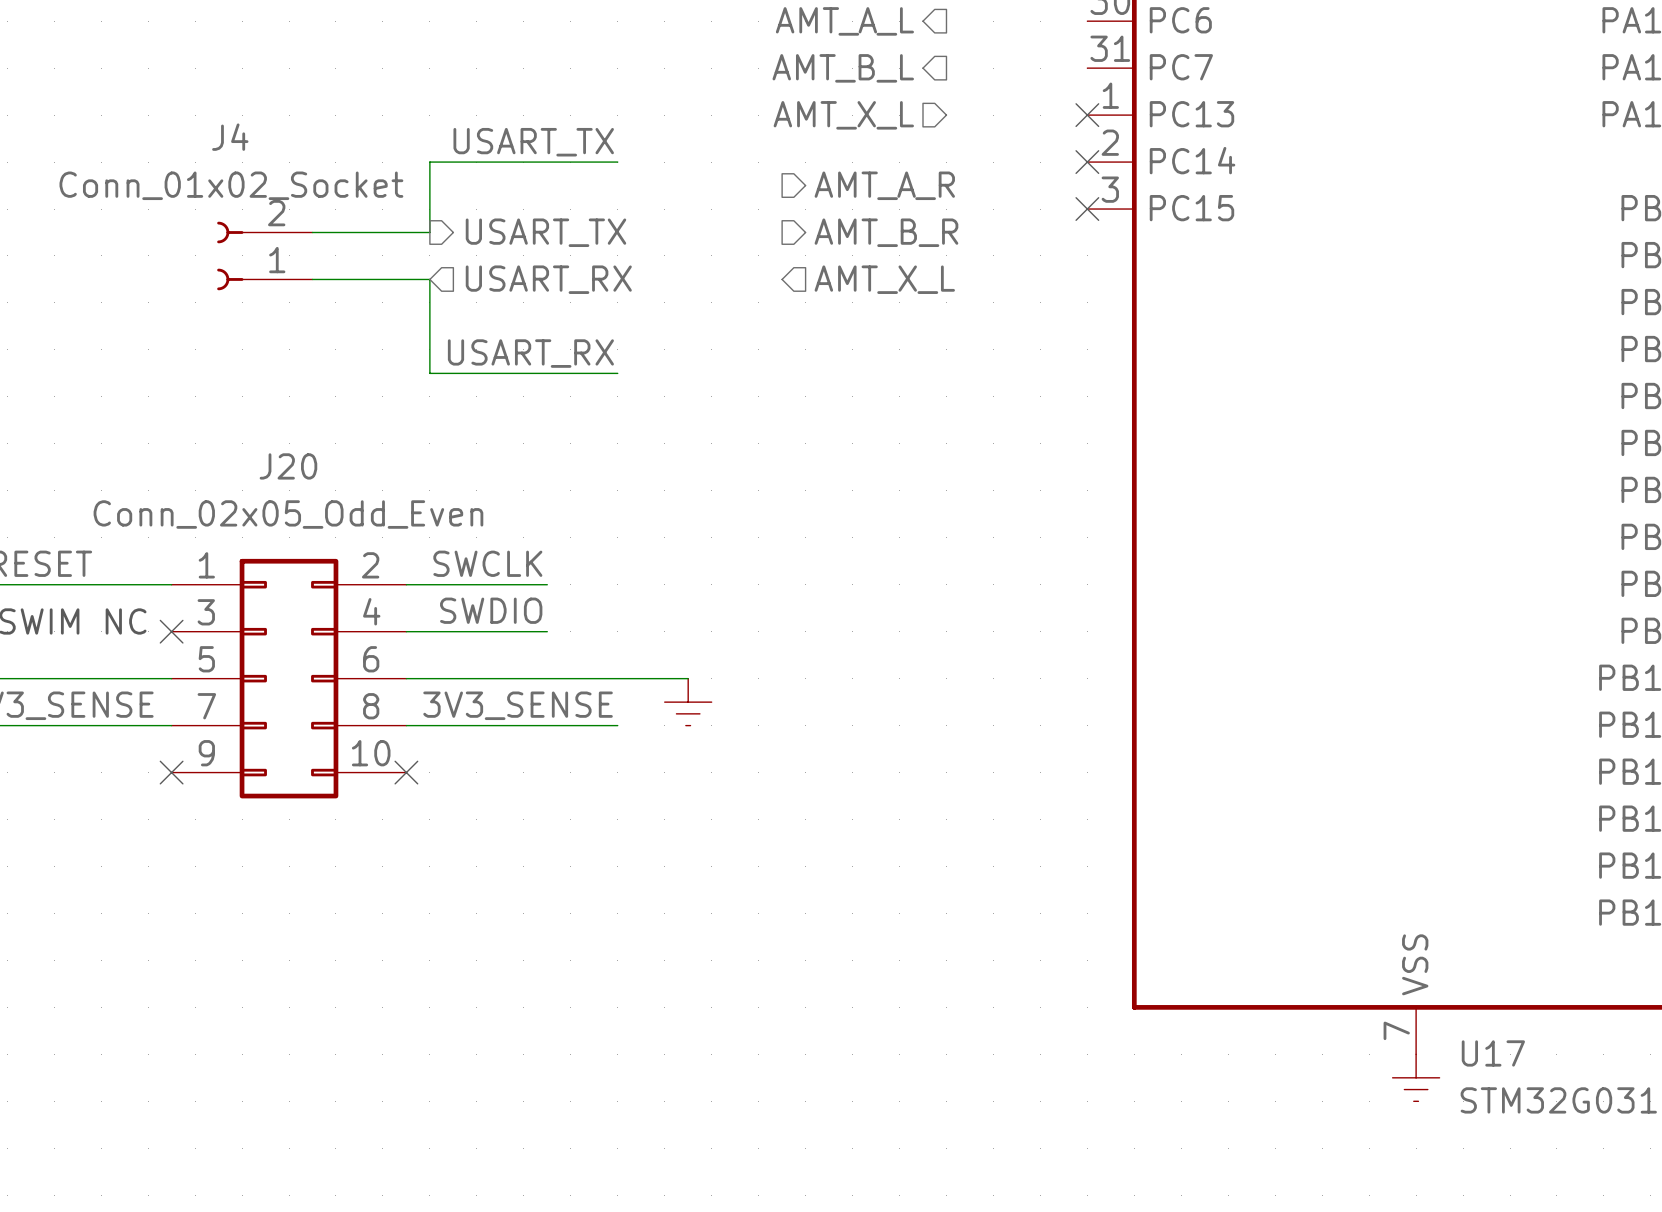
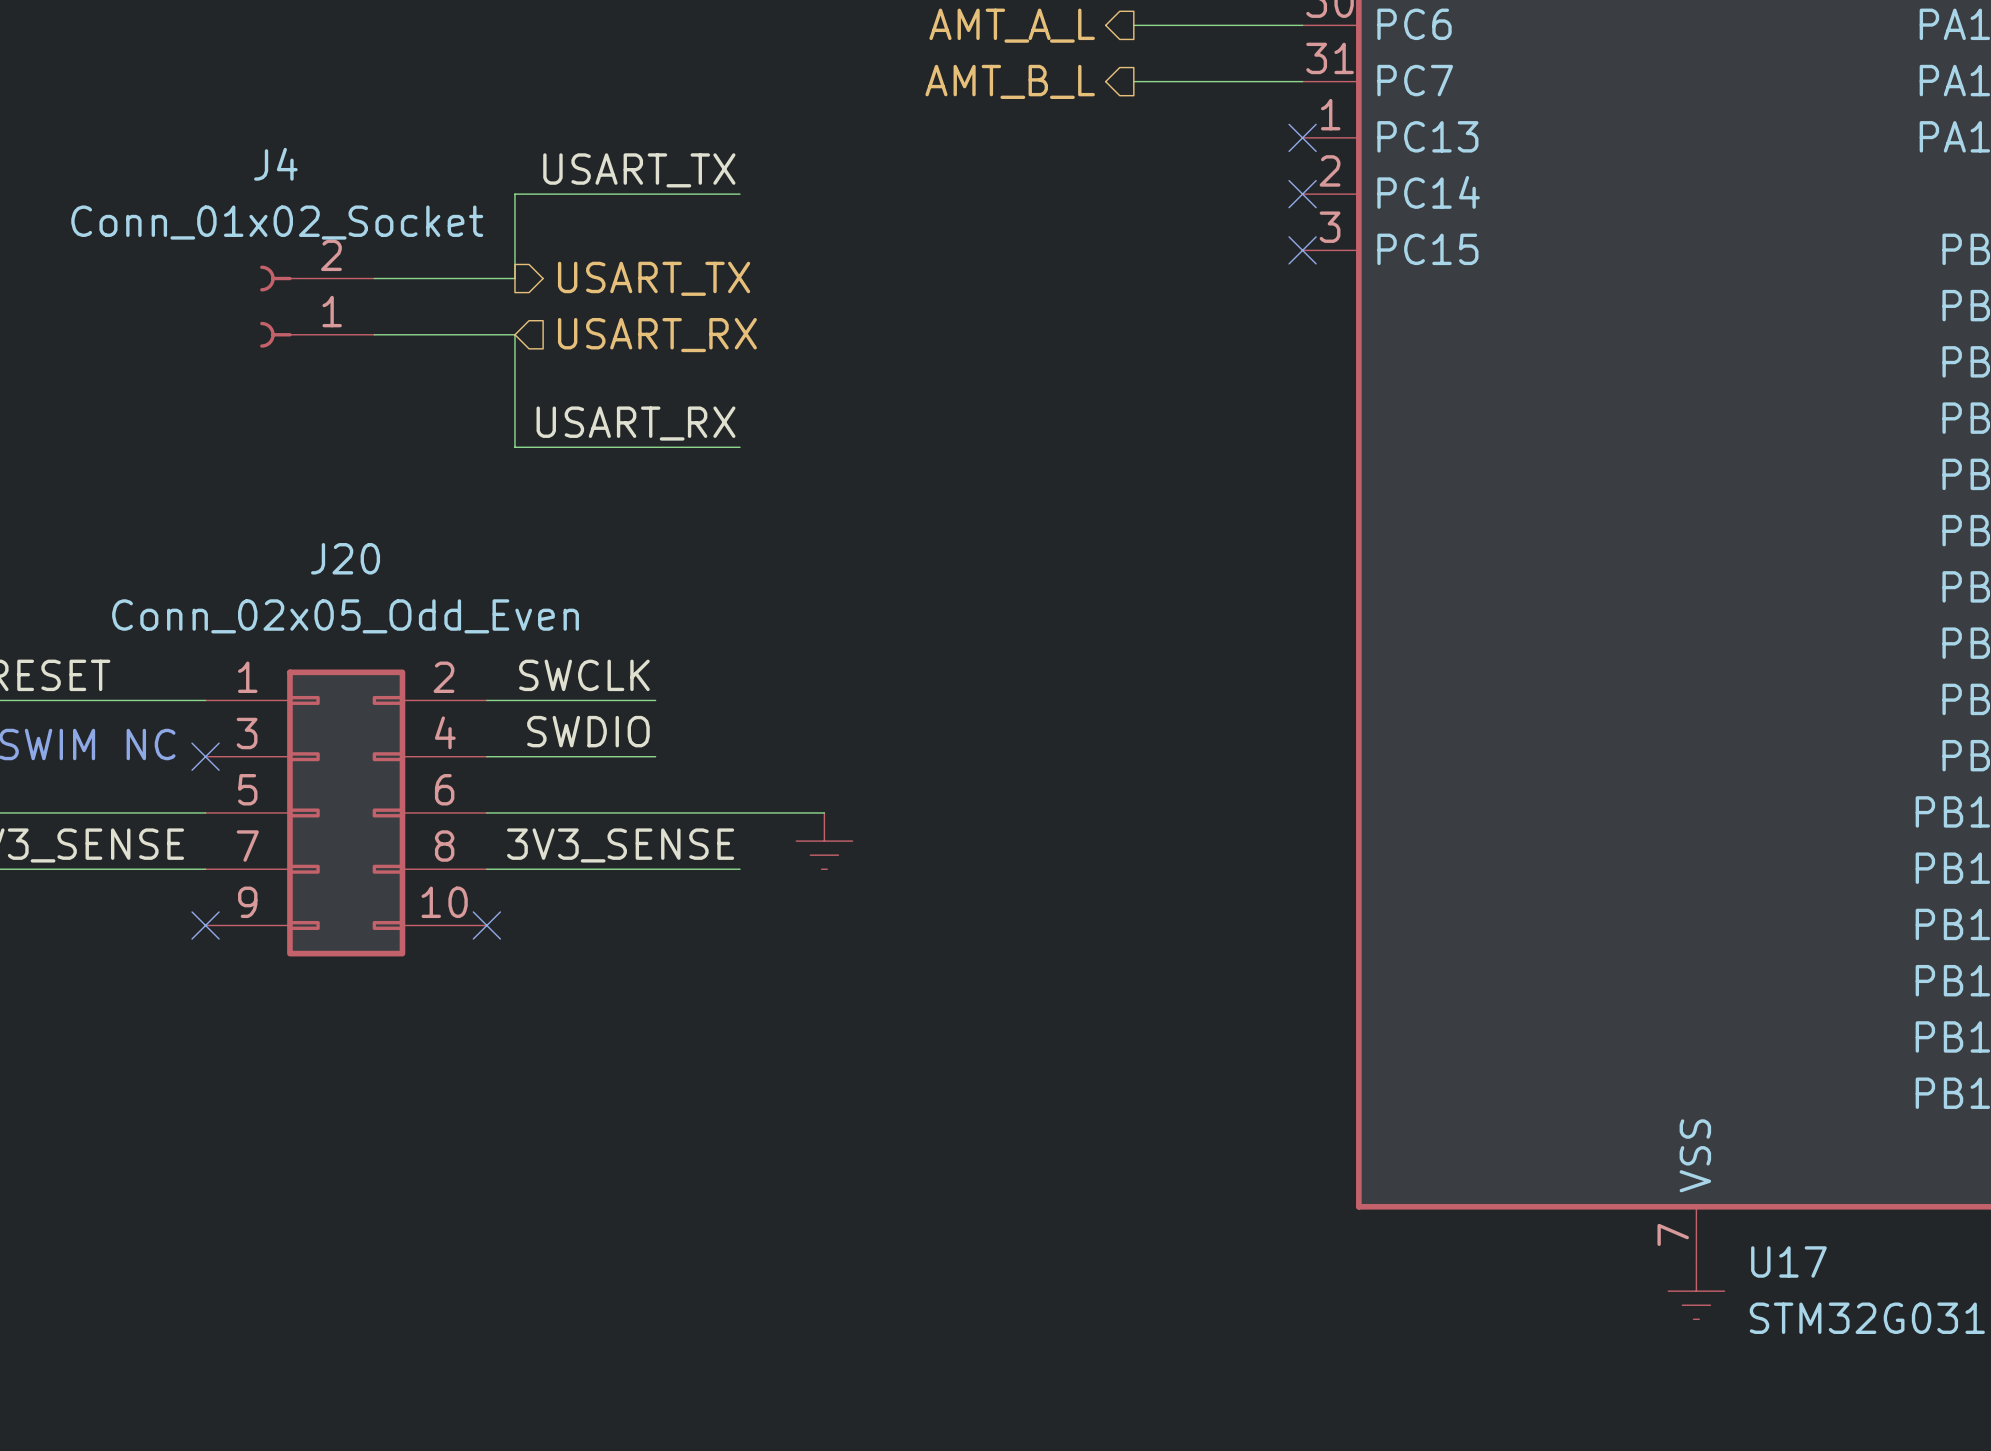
wire: none -> (1133, 25) (1302, 25)
wire: none -> (1133, 81) (1302, 81)
hierarchical label: AMT_X_L (843, 115) -> none
hierarchical label: AMT_A_R (884, 185) -> none
hierarchical label: AMT_B_R (886, 232) -> none
hierarchical label: AMT_X_L (884, 279) -> none

